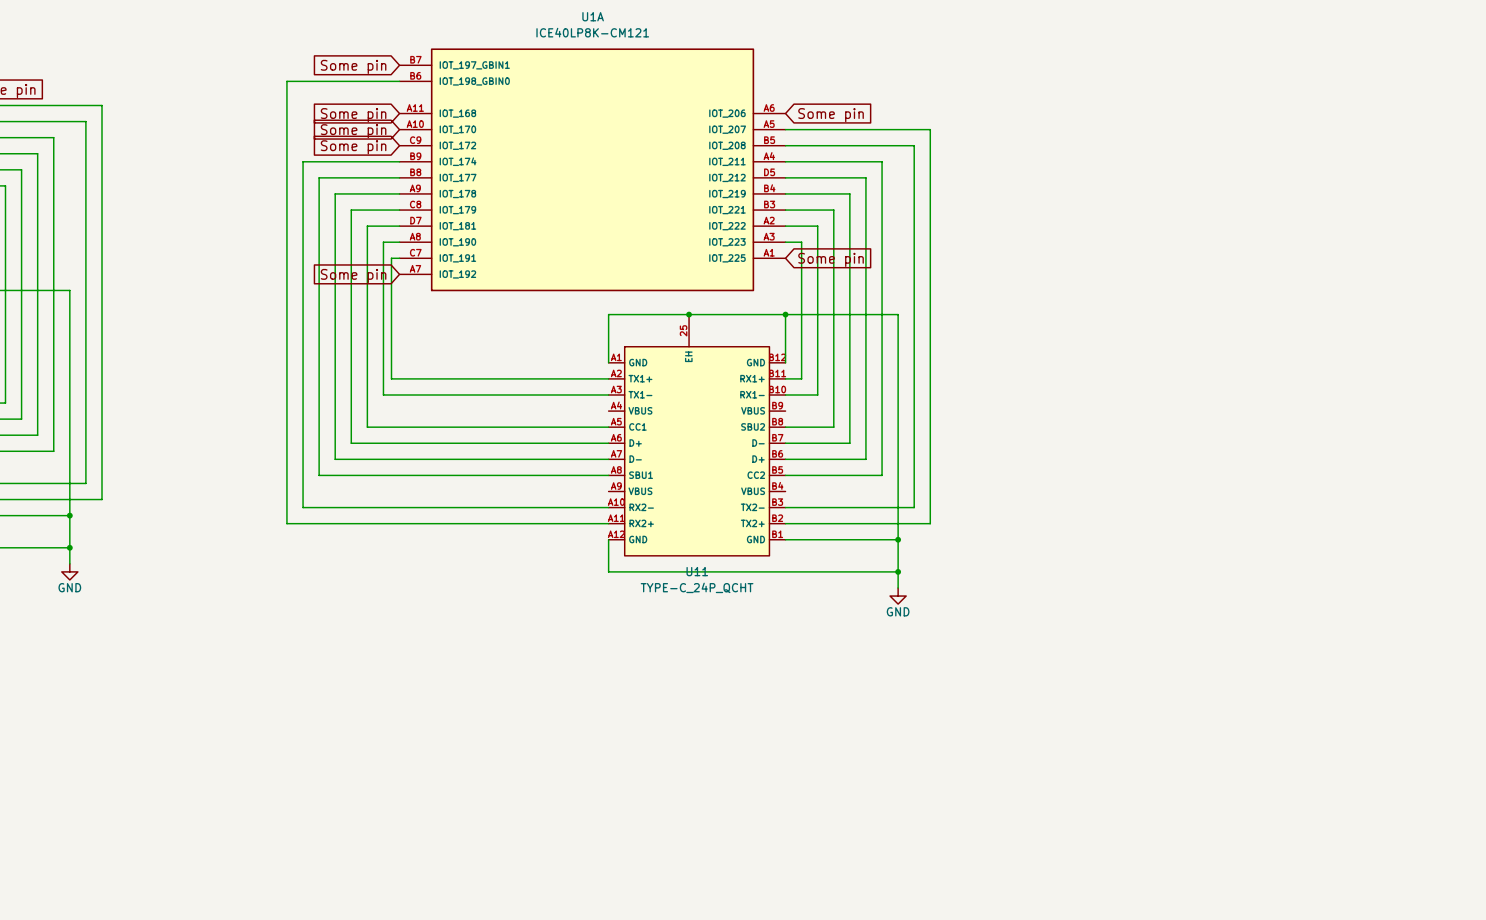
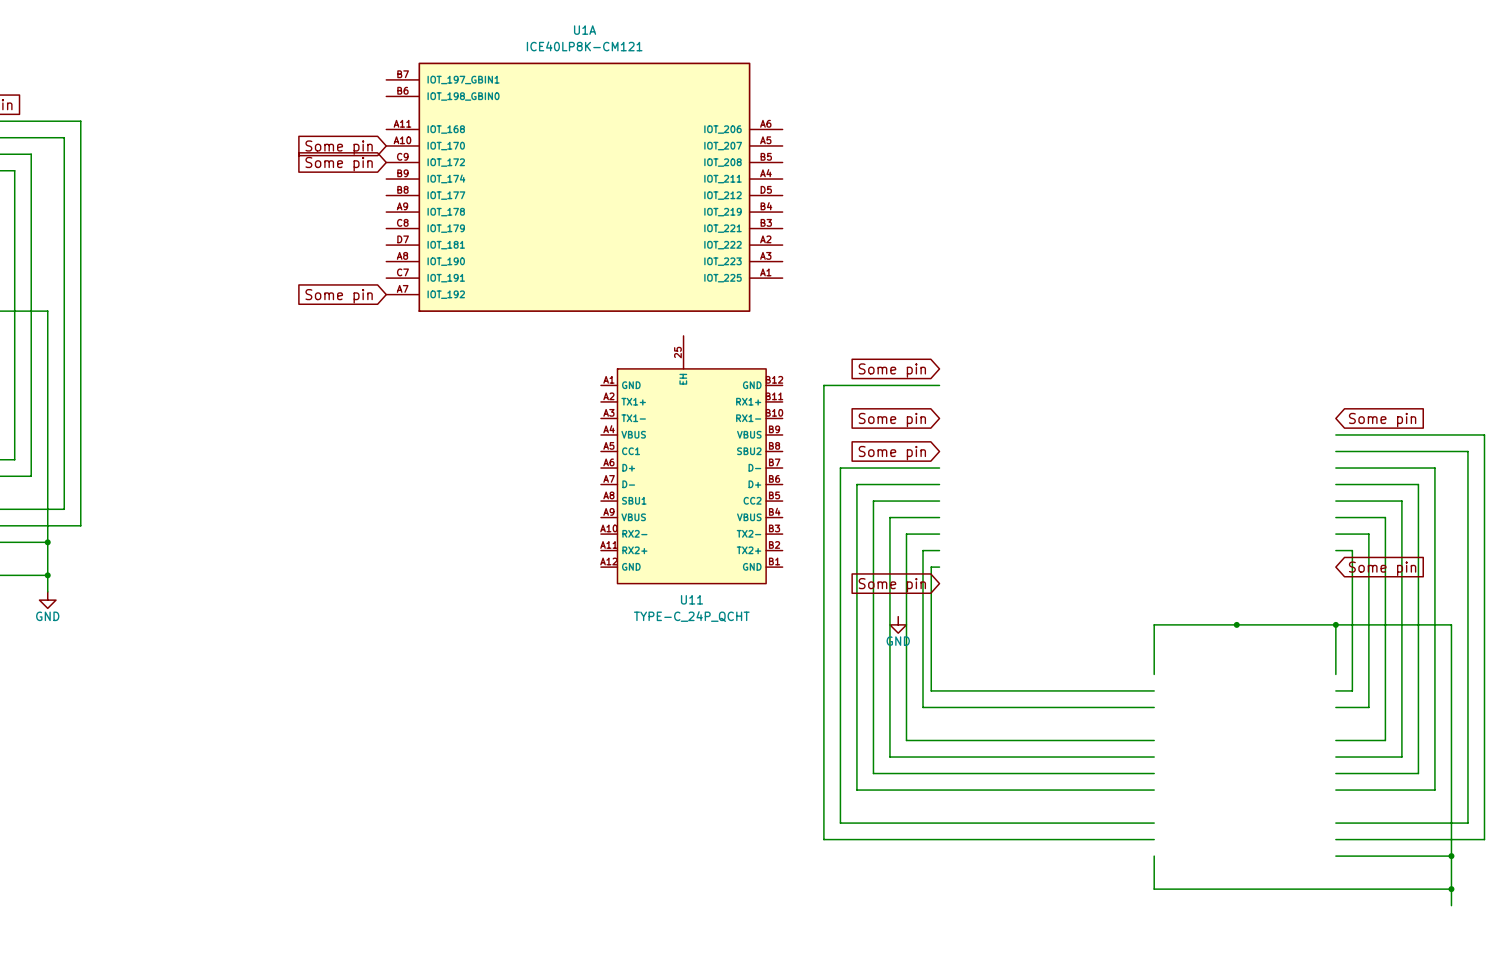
global label: Some pin (353, 66) -> none
wire: (399, 81) (286, 81) (286, 523) (608, 523) -> none
global label: Some pin (353, 115) -> none
global label: Some pin (831, 115) -> none
wire: (785, 129) (930, 129) (930, 523) -> (939, 550) (931, 550)
wire: (785, 145) (914, 145) (914, 507) -> (939, 534) (914, 534)
wire: (399, 161) (303, 161) (303, 507) (608, 507) -> none
wire: (785, 161) (882, 161) (882, 475) -> (939, 501) (881, 501)
wire: (399, 177) (319, 177) (319, 475) (608, 475) -> none
wire: (785, 177) (865, 177) (865, 459) -> (939, 484) (865, 484)
wire: (399, 193) (335, 193) (335, 459) (608, 459) -> none
wire: (785, 193) (849, 193) (849, 443) -> (939, 468) (848, 468)
wire: (399, 210) (351, 210) (351, 443) (608, 443) -> none
wire: (785, 210) (833, 210) (833, 427) (785, 427) -> none
wire: (399, 226) (367, 226) (367, 427) (608, 427) -> none
wire: (785, 226) (817, 226) (817, 395) (785, 395) -> none
wire: (399, 242) (383, 242) (383, 395) (608, 395) -> none
wire: (785, 242) (801, 242) (801, 378) (785, 378) -> none
wire: (399, 258) (391, 258) (391, 378) (608, 378) -> none
global label: Some pin (831, 259) -> none
junction: (689, 314) -> none
wire: (785, 314) (785, 362) -> none
junction: (785, 314) -> none
global label: none -> Some pin (892, 370)
wire: (608, 362) (608, 314) (898, 314) (898, 588) -> none
wire: none -> (939, 385) (823, 385) (823, 839) (1154, 839)
global label: none -> Some pin (892, 420)
global label: none -> Some pin (1382, 420)
wire: none -> (1335, 434) (1484, 434) (1484, 839) (1335, 839)
wire: none -> (1335, 451) (1467, 451) (1467, 823) (1335, 823)
global label: none -> Some pin (892, 453)
wire: (785, 443) (841, 443) -> (1154, 823) (840, 823) (840, 468)
wire: none -> (1335, 468) (1434, 468) (1434, 790) (1335, 790)
wire: (785, 459) (857, 459) -> (1154, 790) (856, 790) (856, 484)
wire: none -> (1335, 484) (1418, 484) (1418, 773) (1335, 773)
wire: (785, 475) (873, 475) -> (1154, 773) (873, 773) (873, 501)
wire: none -> (1335, 501) (1401, 501) (1401, 757) (1335, 757)
wire: none -> (939, 517) (889, 517) (889, 757) (1154, 757)
wire: none -> (1335, 517) (1385, 517) (1385, 740) (1335, 740)
wire: (785, 507) (906, 507) -> (1154, 740) (906, 740) (906, 534)
wire: none -> (1335, 534) (1368, 534) (1368, 707) (1335, 707)
wire: (785, 523) (922, 523) -> (1154, 707) (923, 707) (923, 550)
wire: none -> (1335, 550) (1352, 550) (1352, 690) (1335, 690)
wire: (608, 539) (608, 571) (898, 571) -> none
wire: (785, 539) (898, 539) -> none
junction: (898, 539) -> none
wire: none -> (939, 567) (931, 567) (931, 690) (1154, 690)
global label: none -> Some pin (1382, 568)
global label: none -> Some pin (892, 585)
junction: (898, 571) -> none
junction: none -> (1236, 624)
wire: none -> (1335, 624) (1335, 674)
junction: none -> (1335, 624)
wire: none -> (1154, 674) (1154, 624) (1451, 624) (1451, 905)
wire: none -> (1154, 856) (1154, 889) (1451, 889)
wire: none -> (1335, 856) (1451, 856)
junction: none -> (1451, 856)
junction: none -> (1451, 889)

